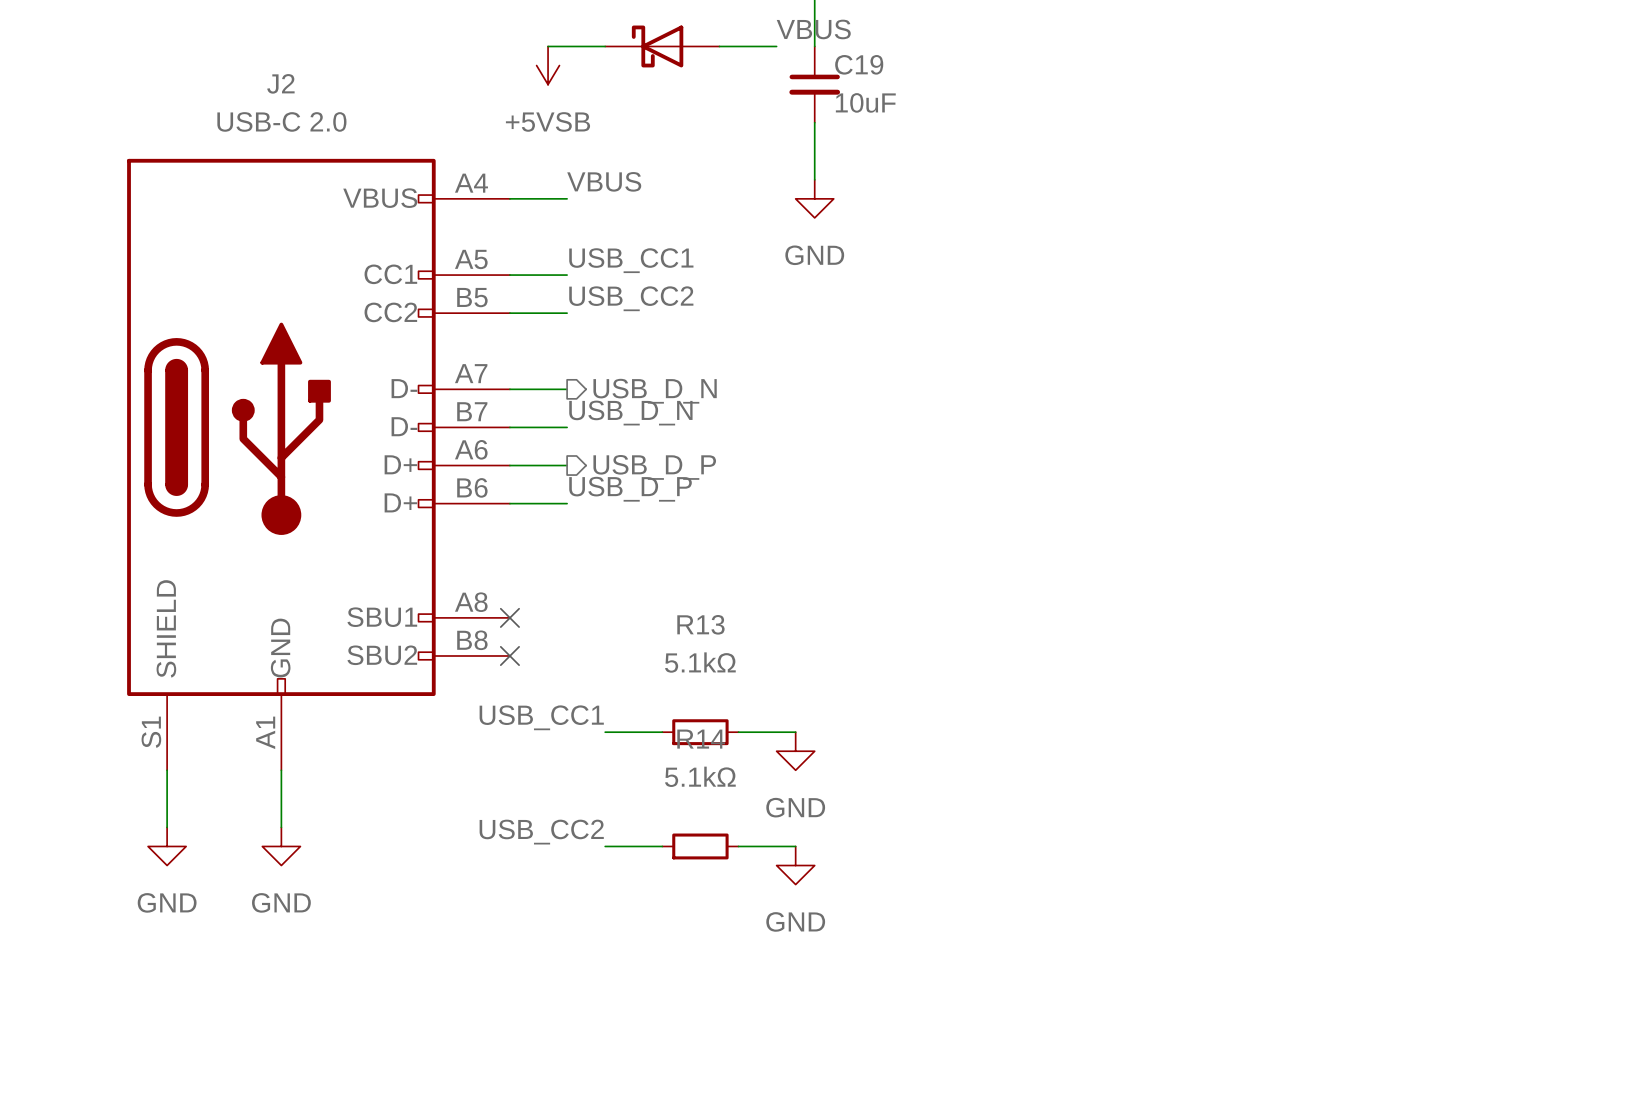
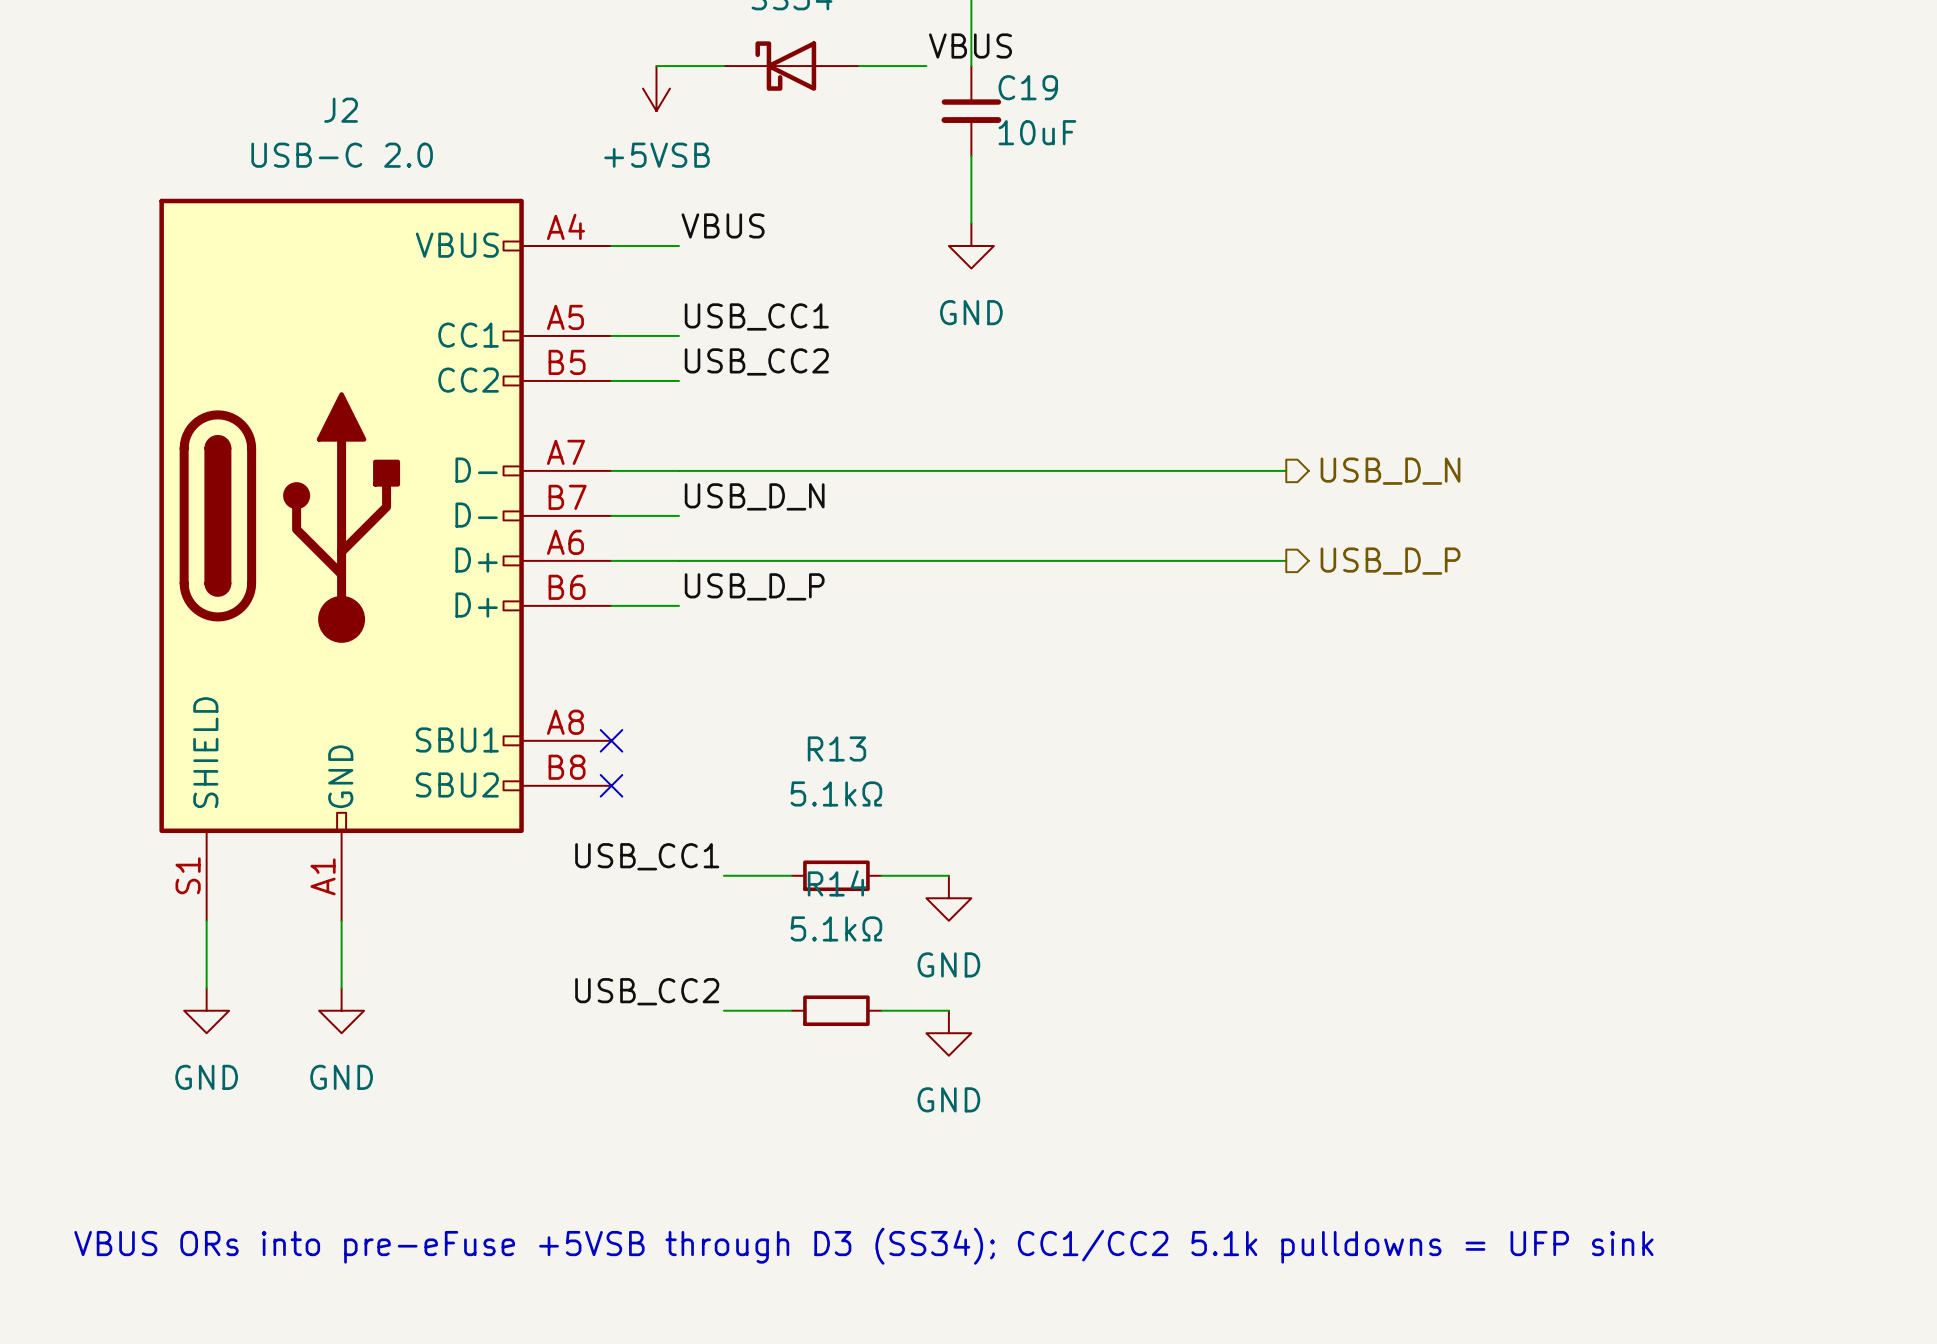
wire: none -> (678, 470) (1286, 470)
hierarchical label: USB_D_N (655, 391) -> none
hierarchical label: none -> USB_D_N (1390, 471)
wire: none -> (678, 560) (1286, 560)
hierarchical label: USB_D_P (654, 467) -> none
hierarchical label: none -> USB_D_P (1390, 561)
text: none -> VBUS ORs into pre-eFuse +5VSB through D3 (SS34); CC1/CC2 5.1k pulldowns = UFP sink (863, 1246)

